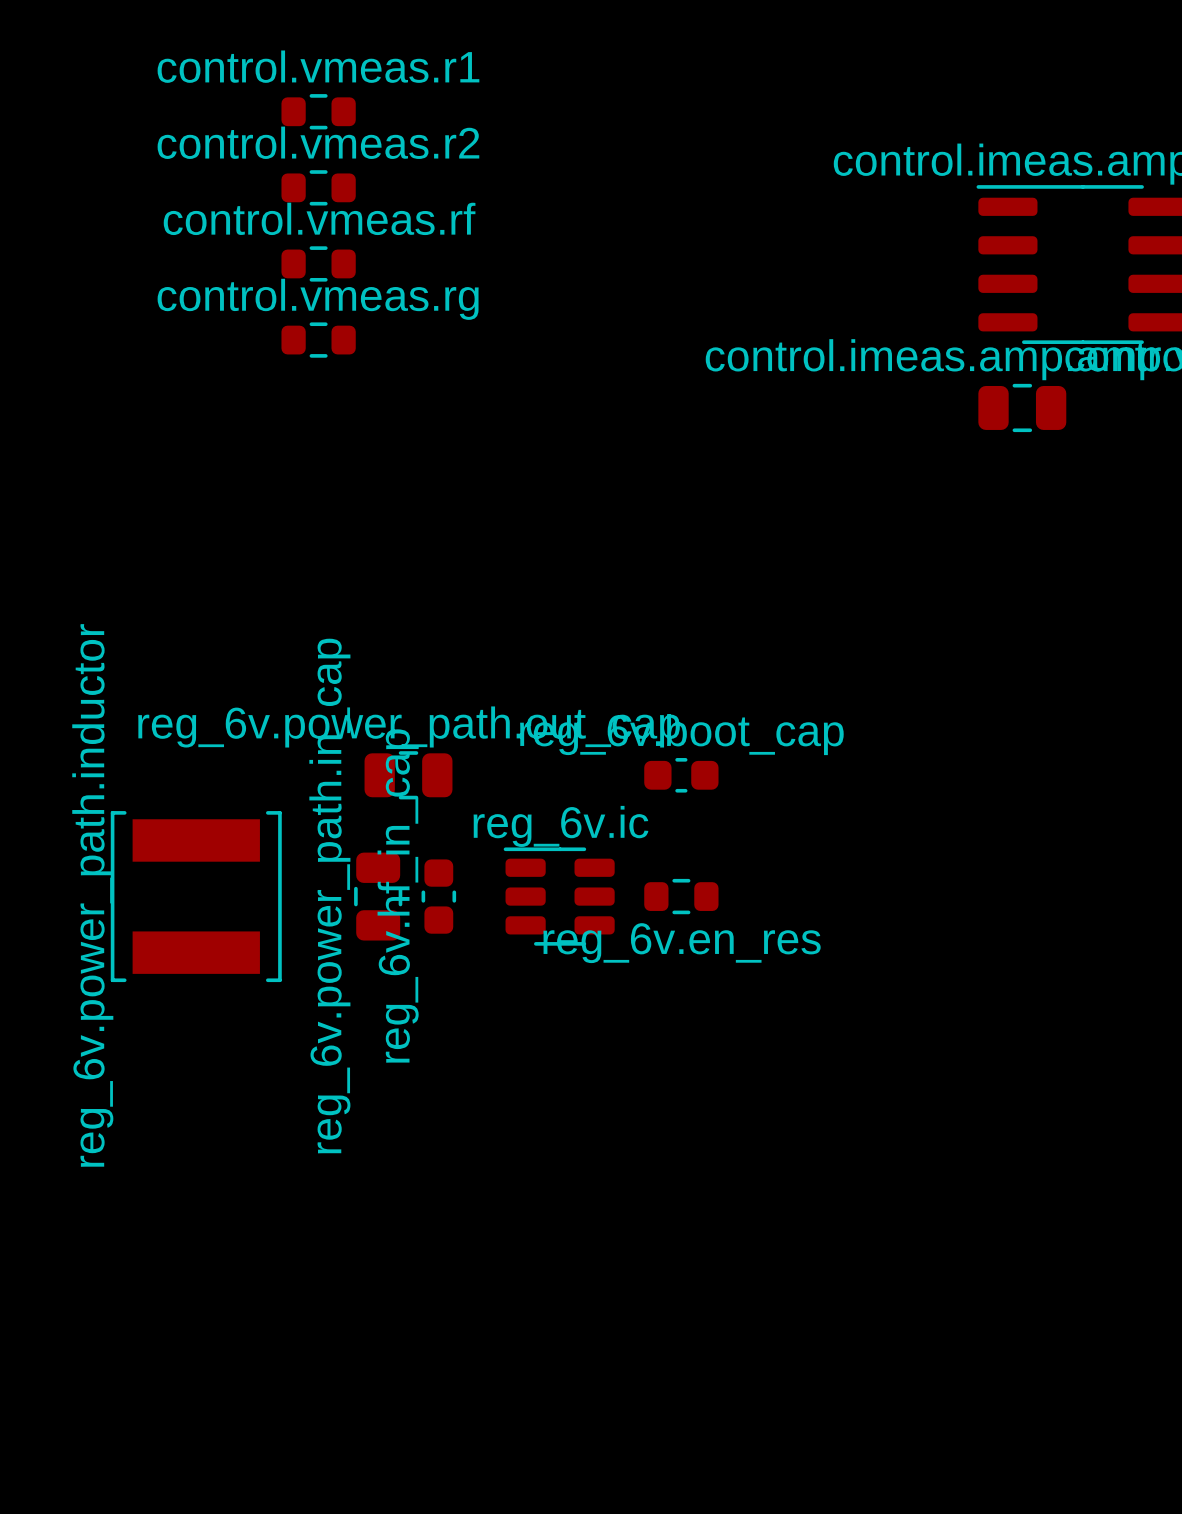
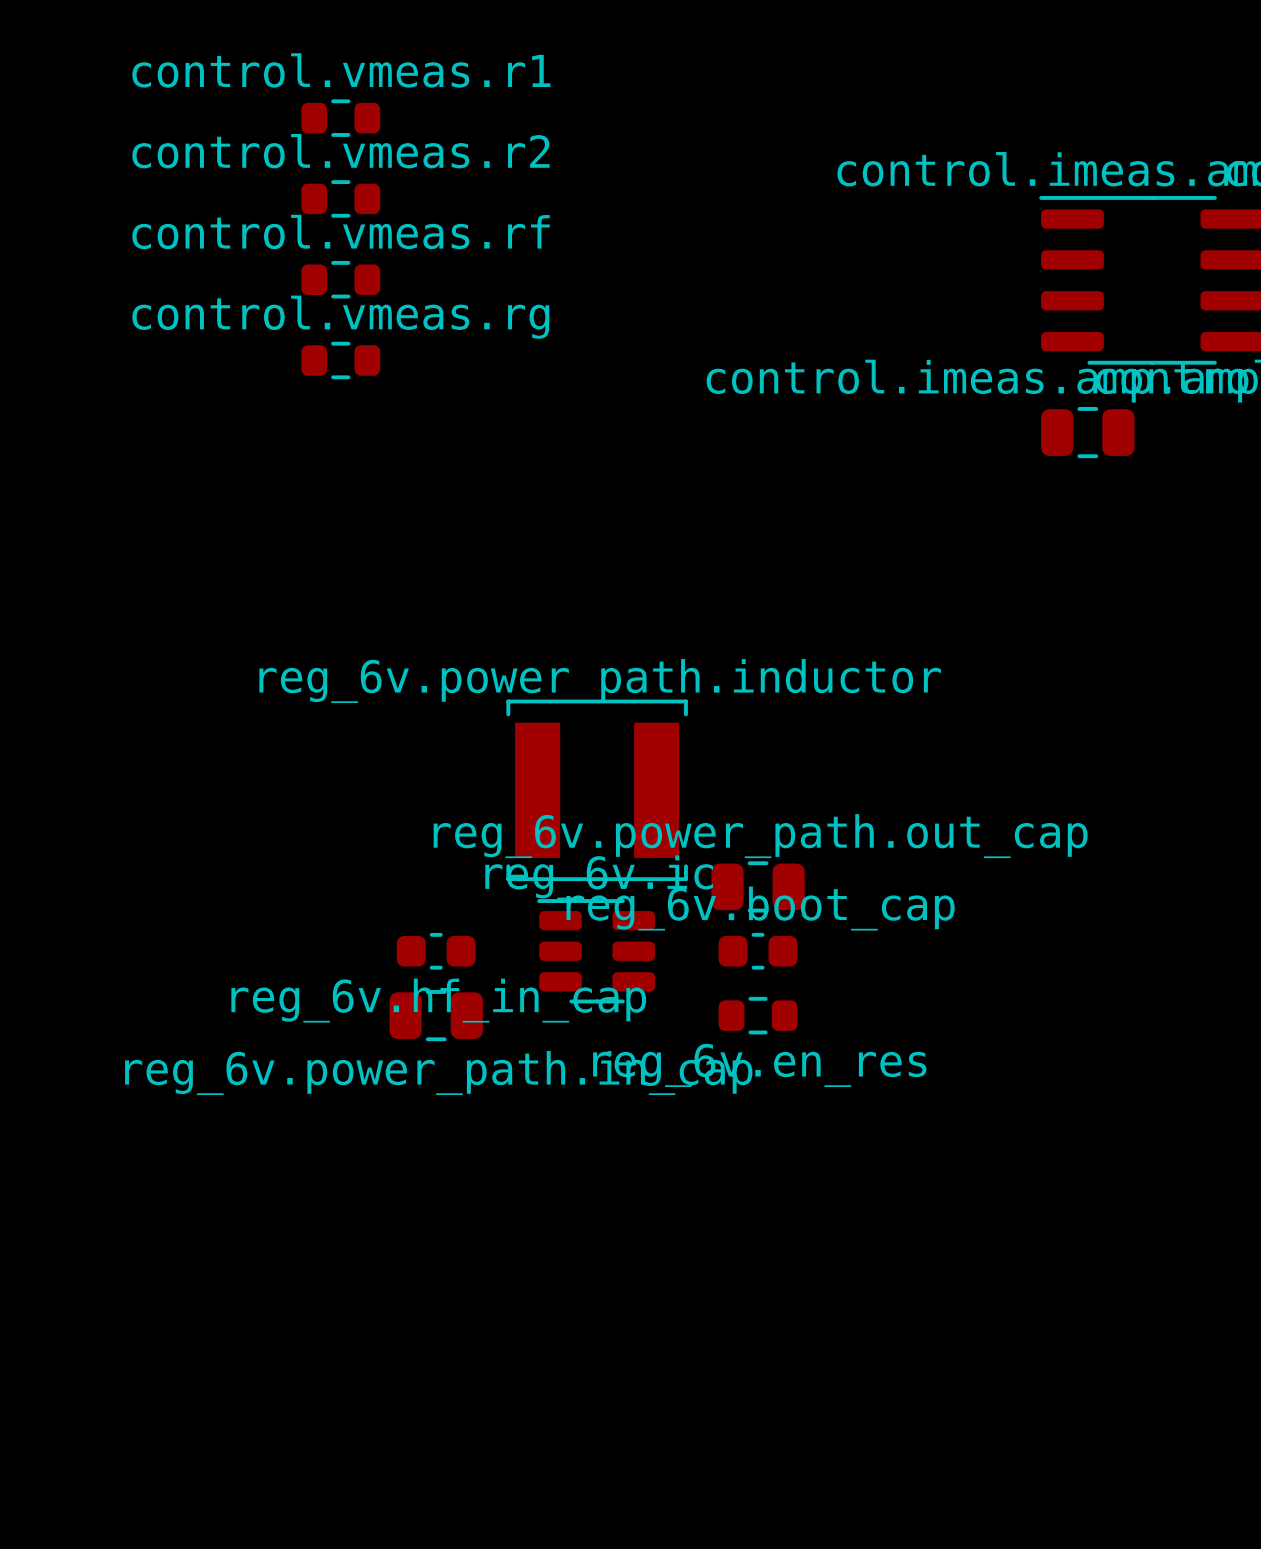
reg_6v.power_path.out_cap position: (408, 775) -> (758, 886)
reg_6v.boot_cap position: (681, 775) -> (758, 951)
reg_6v.power_path.inductor rotation: 0° (196, 896) -> 90° clockwise (597, 790)
reg_6v.power_path.inductor position: (196, 896) -> (597, 790)
reg_6v.power_path.in_cap name position: reg_6v.power_path.in_cap (329, 896) -> reg_6v.power_path.in_cap (438, 1073)
reg_6v.power_path.in_cap rotation: 0° (378, 896) -> 90° clockwise (436, 1015)
reg_6v.power_path.in_cap position: (378, 896) -> (436, 1015)
reg_6v.hf_in_cap name position: reg_6v.hf_in_cap (398, 896) -> reg_6v.hf_in_cap (438, 1000)
reg_6v.hf_in_cap rotation: 0° (438, 896) -> 90° clockwise (436, 951)
reg_6v.en_res position: (681, 896) -> (758, 1015)

